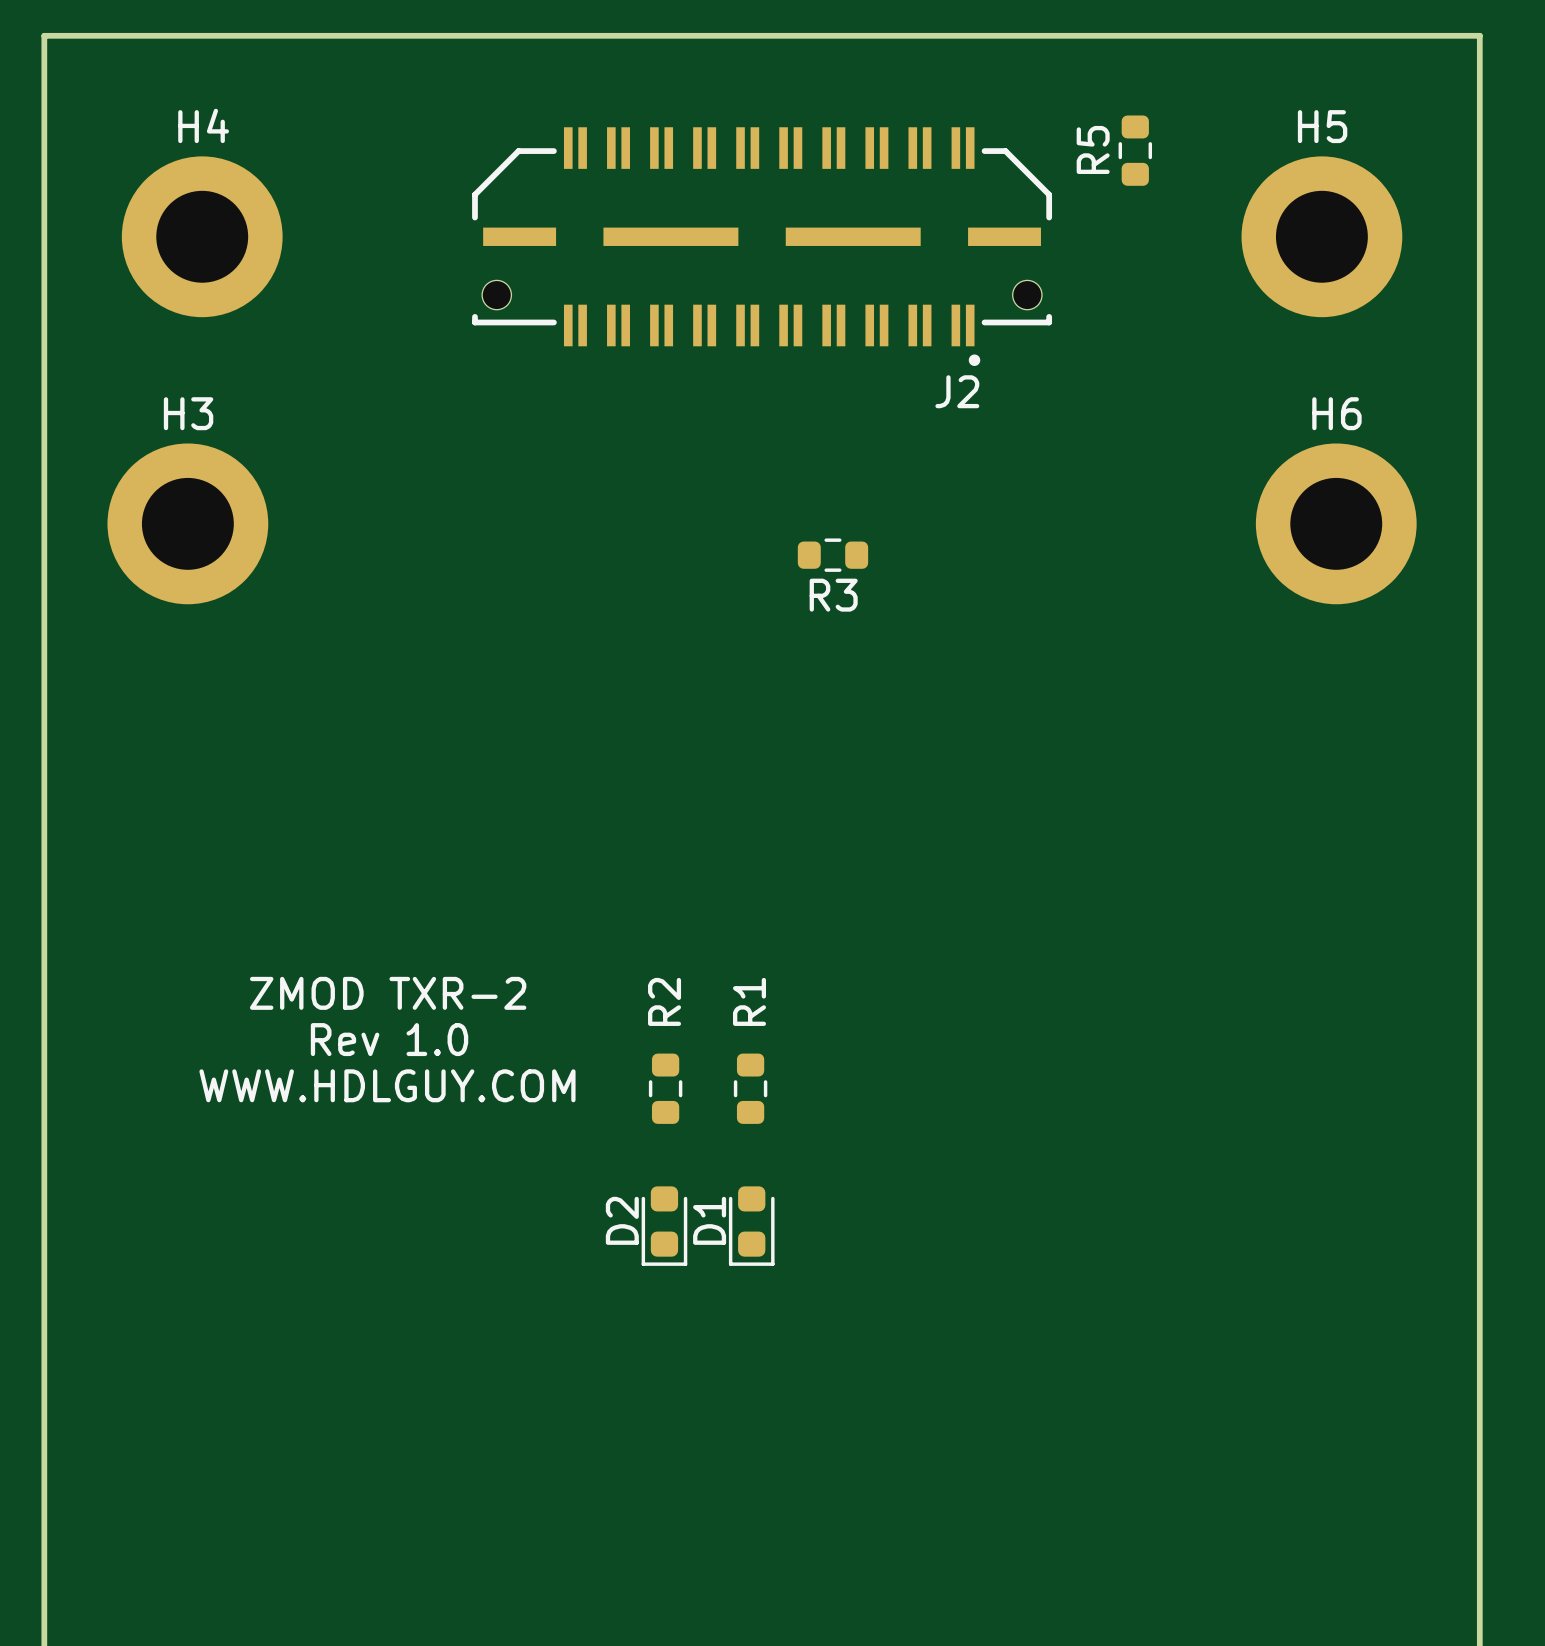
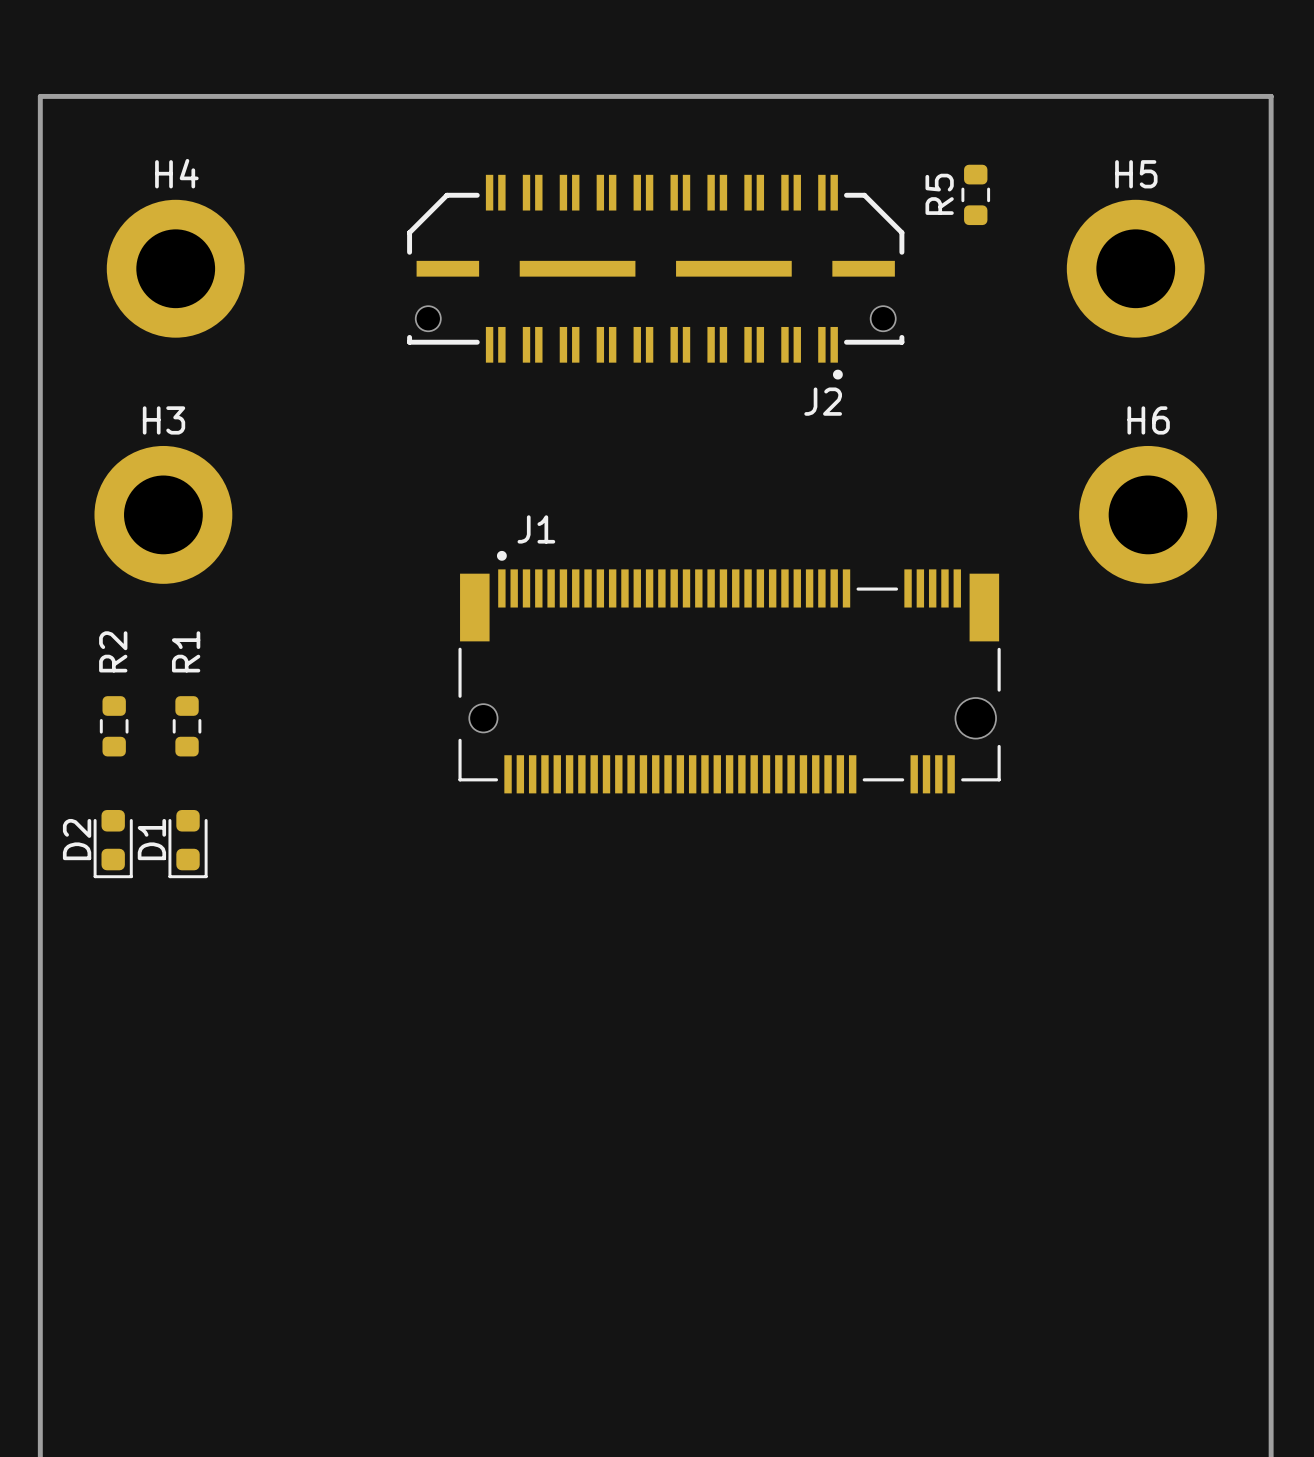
R3: (832, 555) -> none
J1: none -> (729, 672)
text: ZMOD TXR-2 (388, 993) -> none
text: Rev 1.0 (389, 1039) -> none
text: WWW.HDLGUY.COM (387, 1085) -> none
R2 position: (665, 1088) -> (114, 726)
R1 position: (750, 1088) -> (187, 726)
D2 position: (664, 1226) -> (113, 844)
D1 position: (751, 1226) -> (188, 844)

